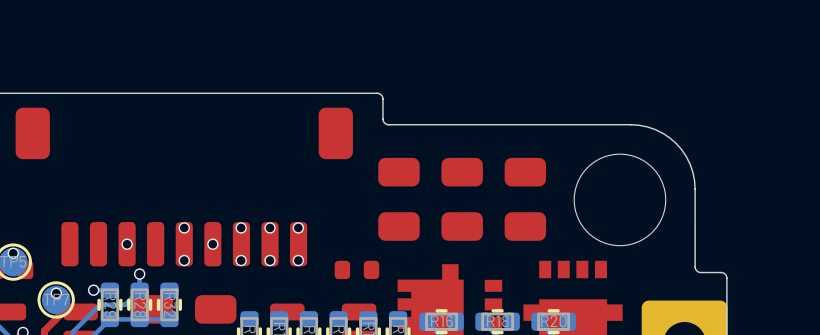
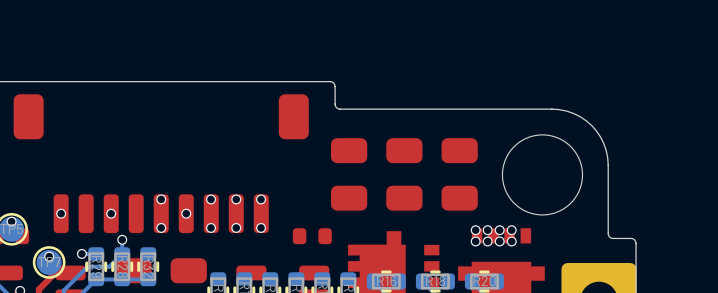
via: none -> (61, 213)
via: none -> (475, 230)
via: none -> (487, 230)
via: none -> (499, 230)
via: none -> (511, 230)
via: none -> (475, 241)
via: none -> (487, 241)
via: none -> (499, 241)
via: none -> (511, 241)

